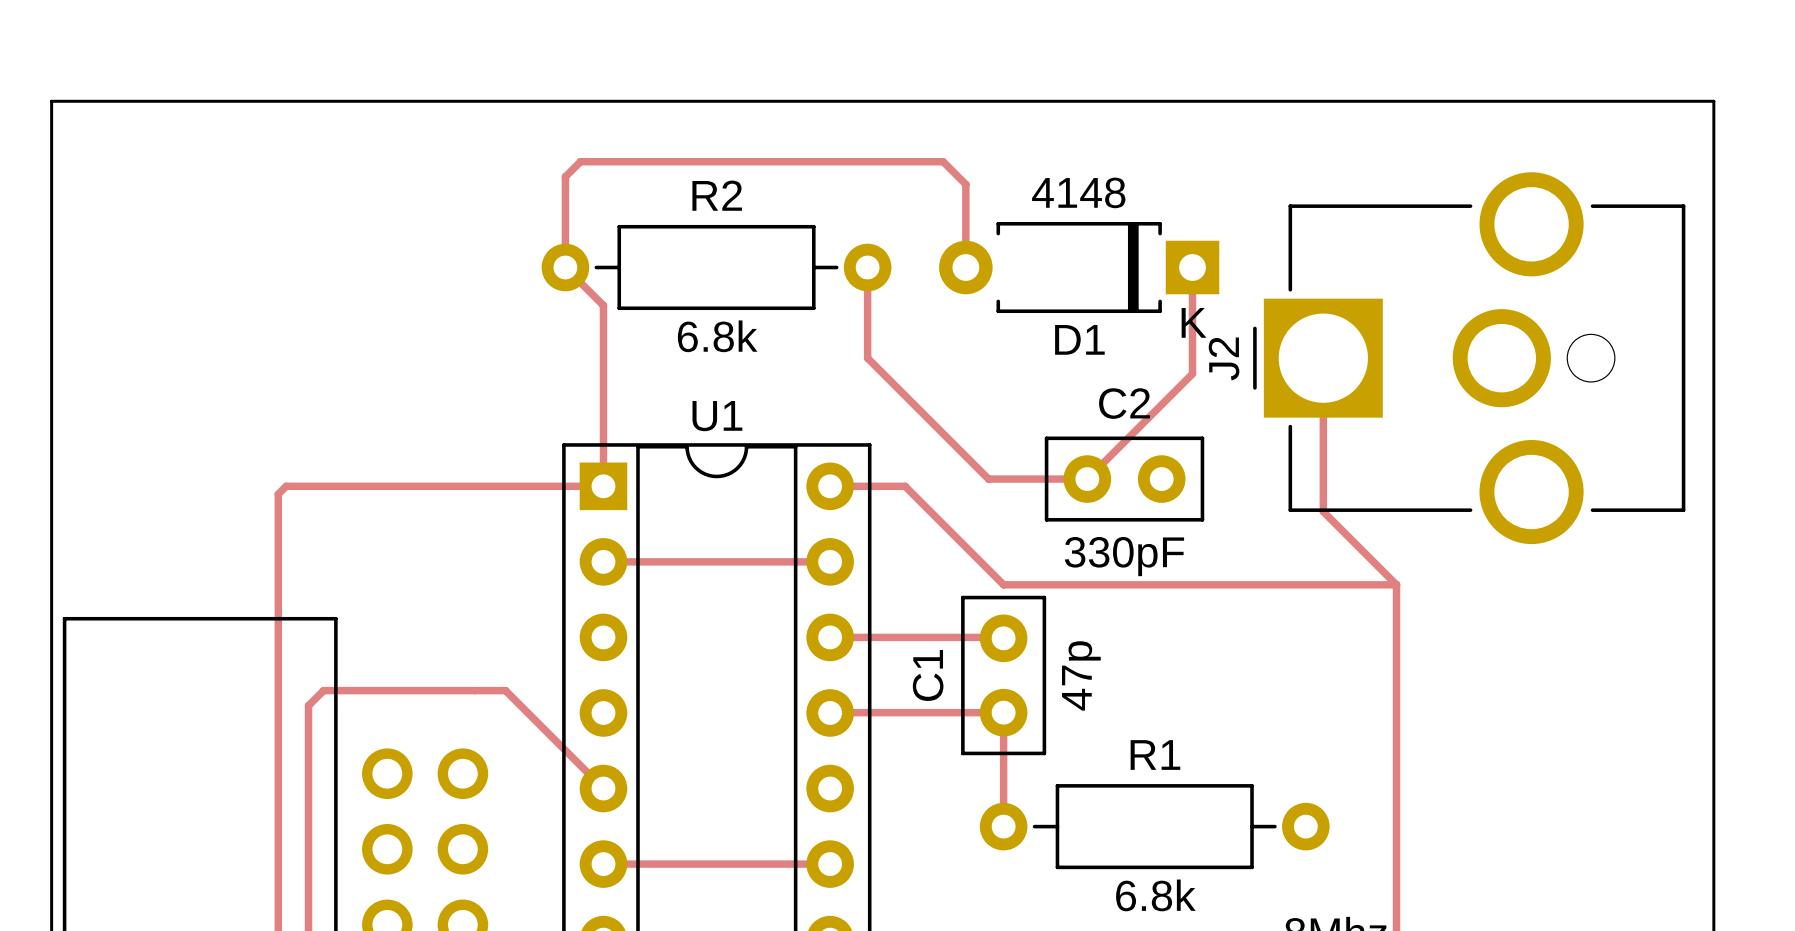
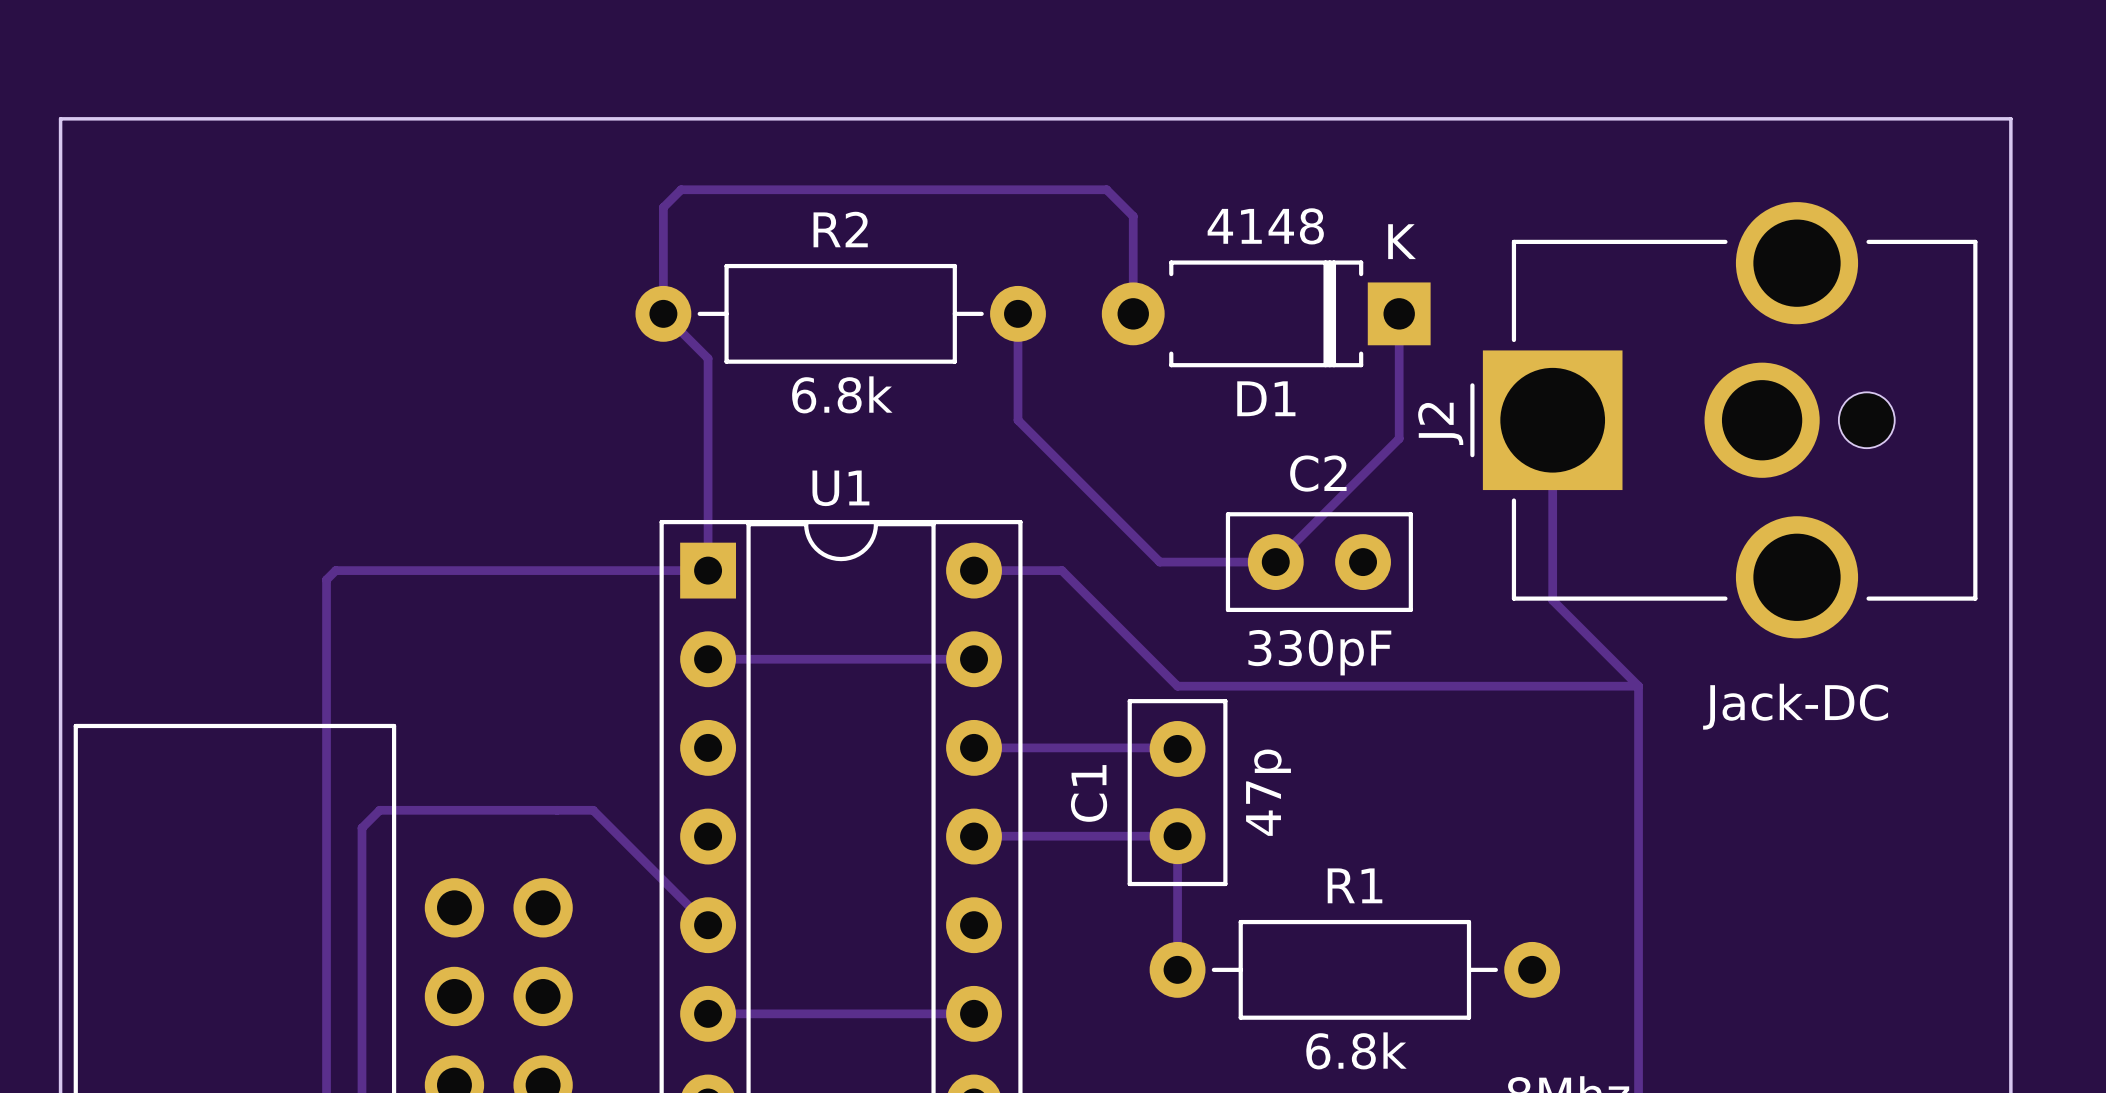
D1 text position: K (1194, 322) -> K (1402, 241)
J2 value: none -> Jack-DC (1795, 706)

